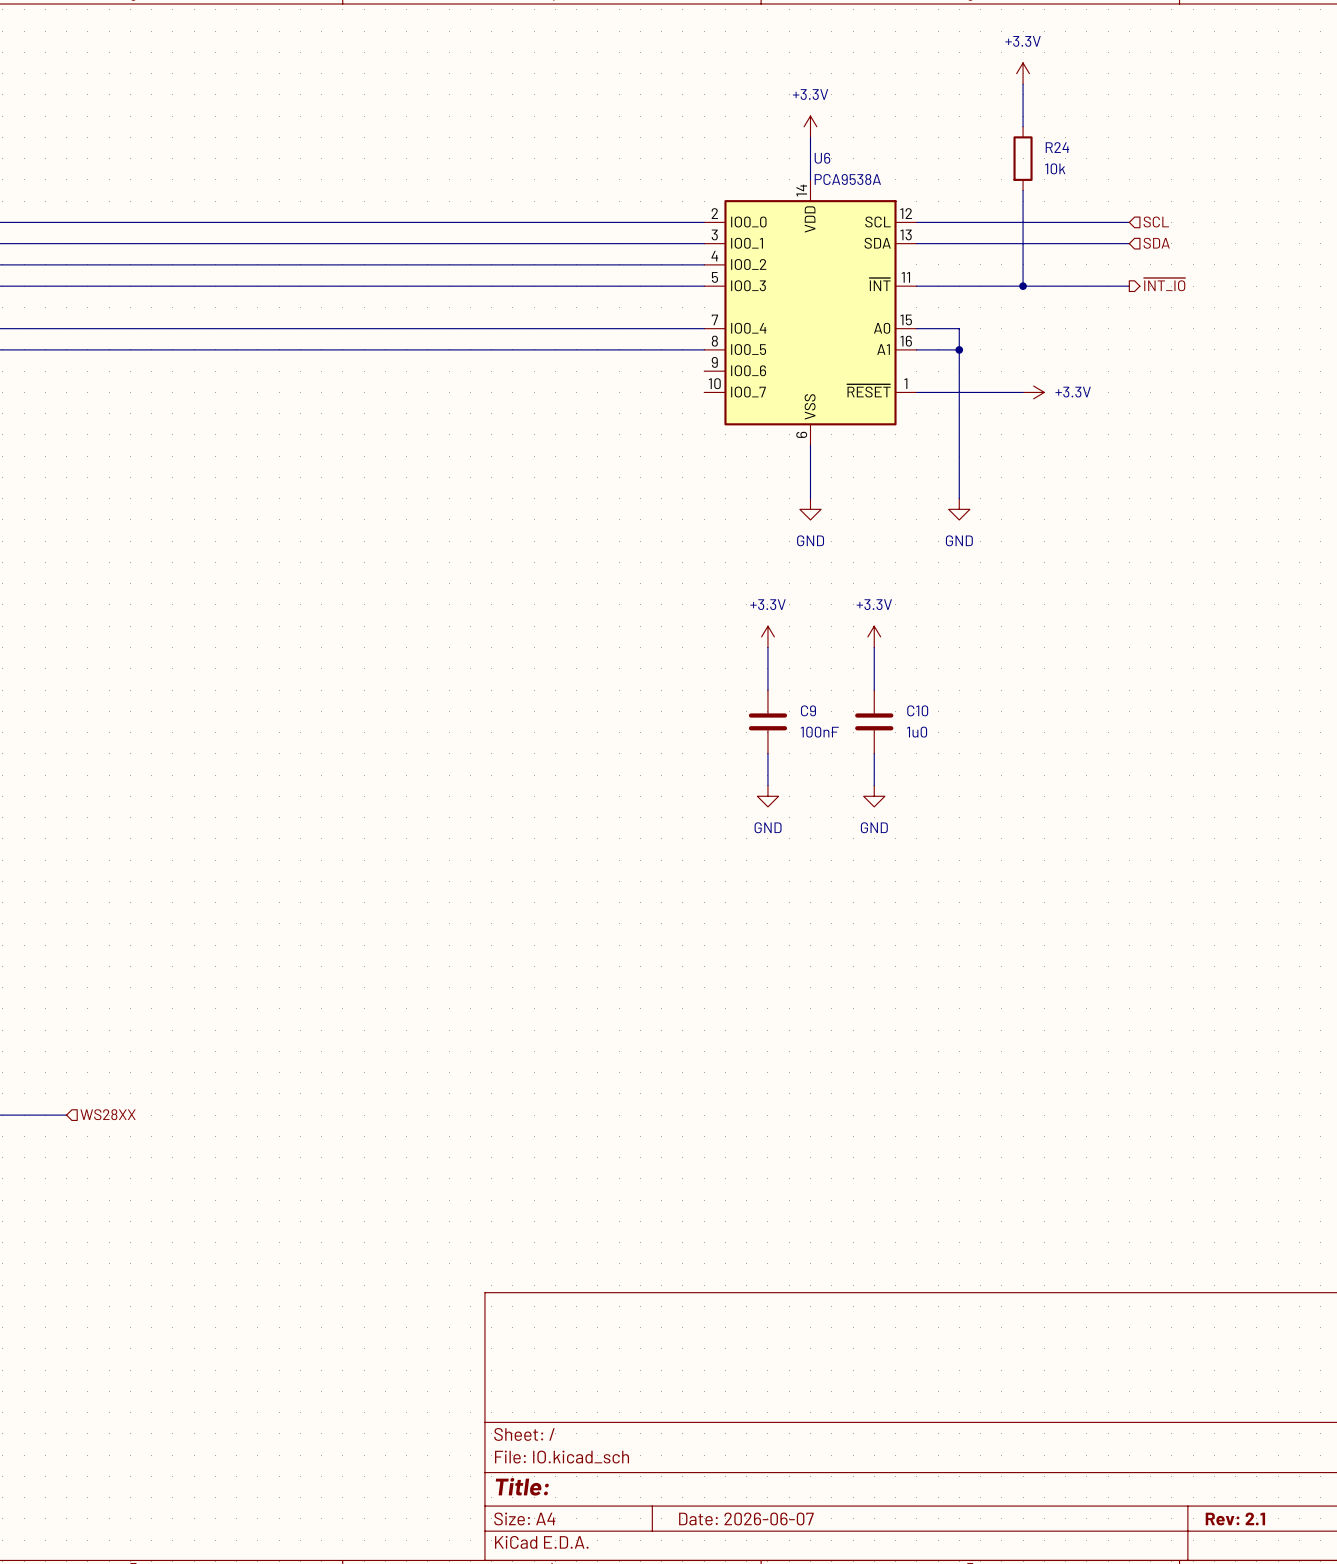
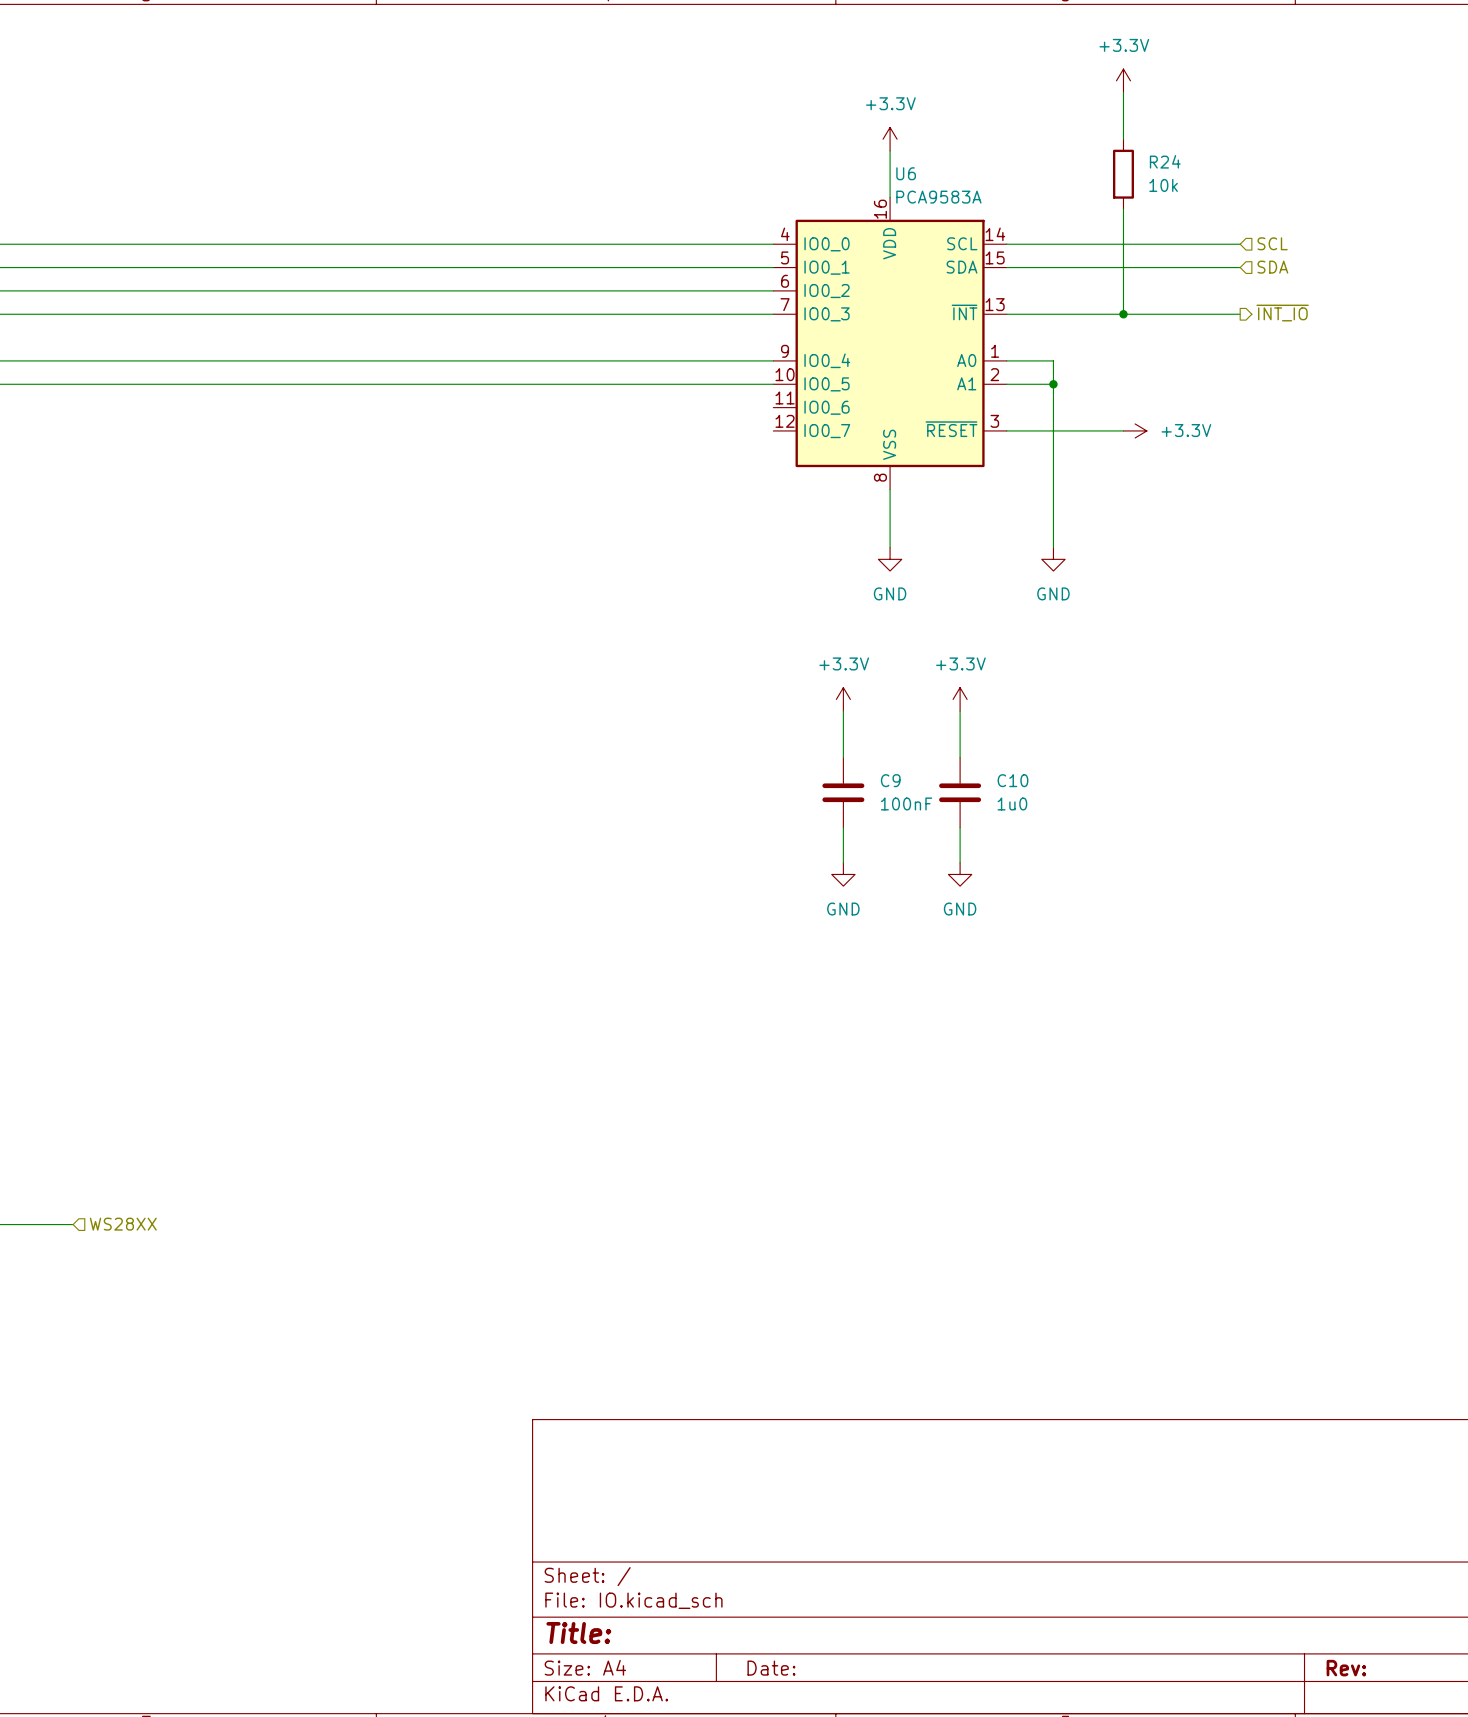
U6 symbol: [704, 179, 917, 446] -> [773, 197, 1007, 490]
U6 value: PCA9538A (847, 179) -> PCA9583A (938, 197)
title block: Date: 2026-06-07 (746, 1518) -> Date: (771, 1668)
title block: Rev: 2.1 (1235, 1518) -> Rev: (1346, 1668)

